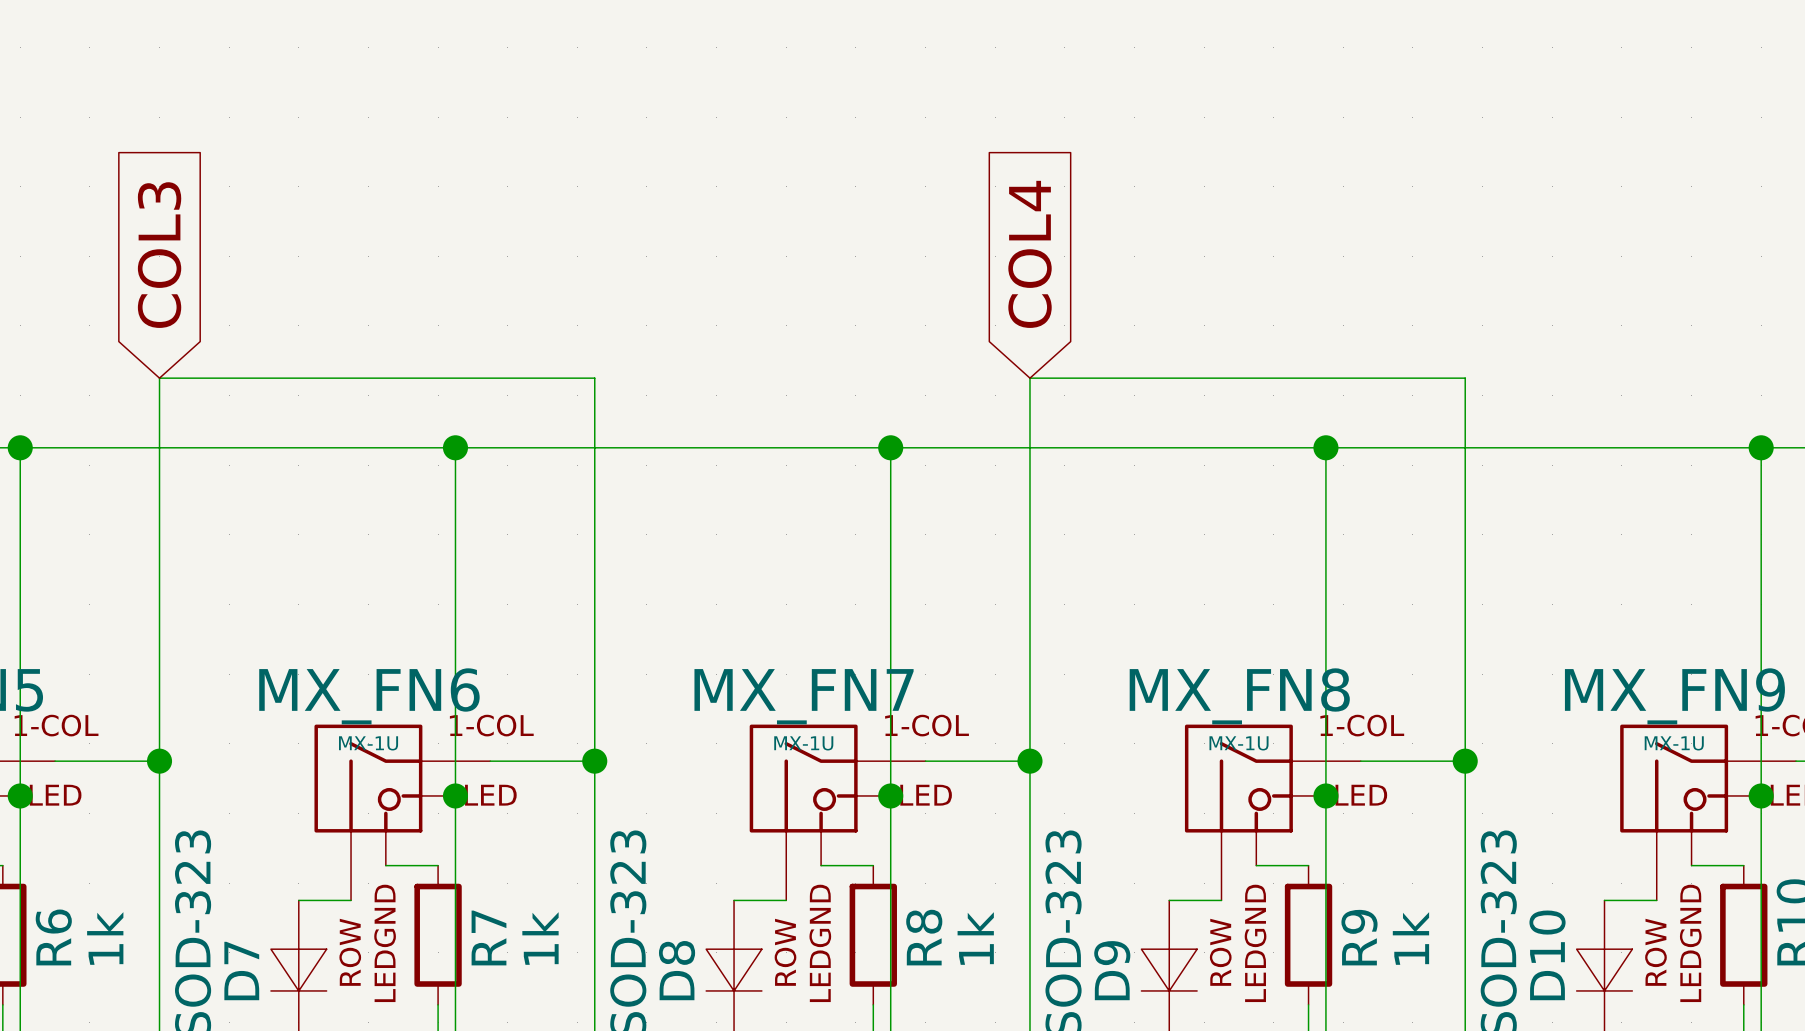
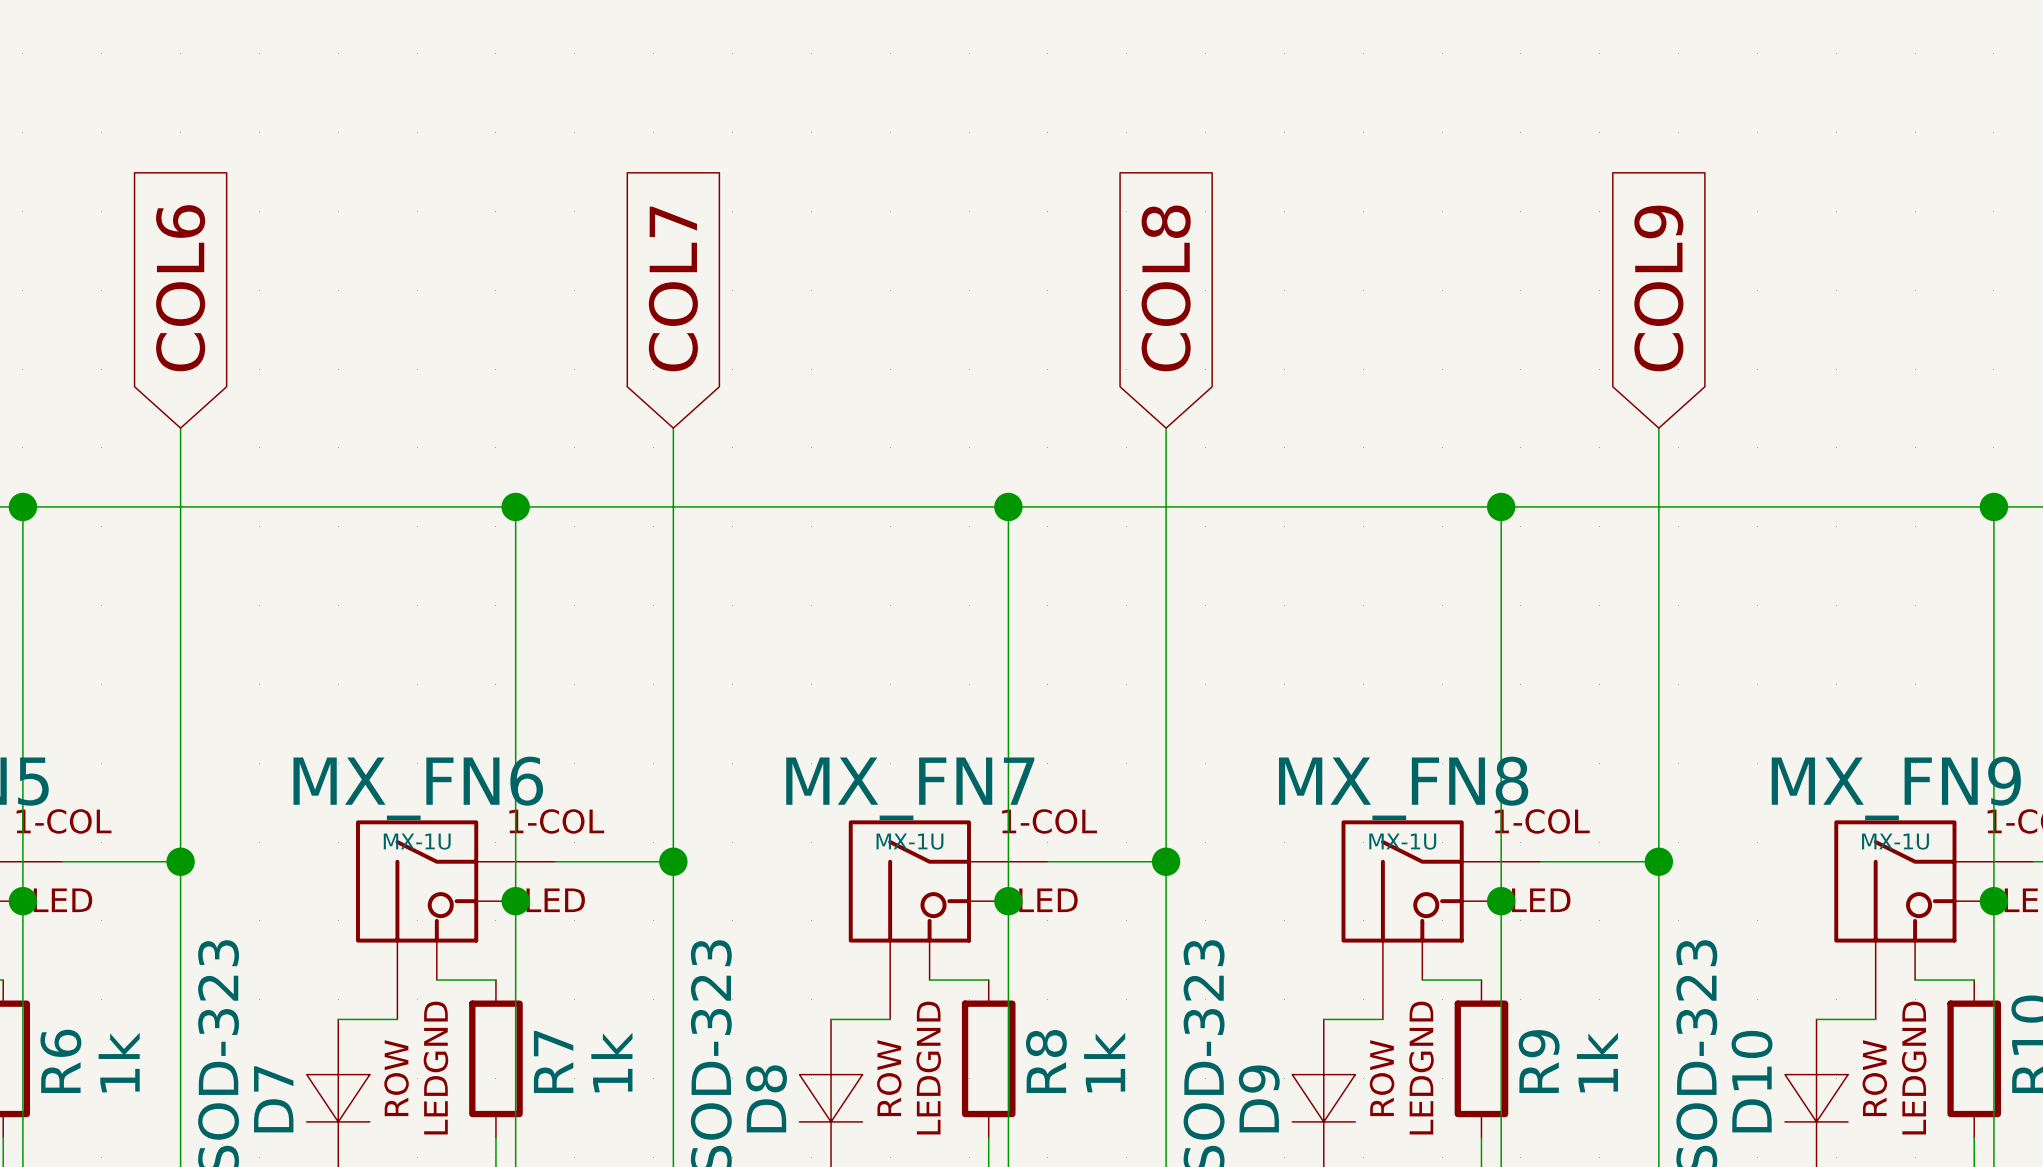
global label: COL4 (1030, 254) -> COL8 (1166, 288)
global label: none -> COL9 (1658, 288)
global label: COL3 (159, 255) -> COL6 (180, 288)
global label: none -> COL7 (673, 288)
wire: (159, 378) (594, 378) -> none
wire: (1029, 378) (1465, 378) -> none

